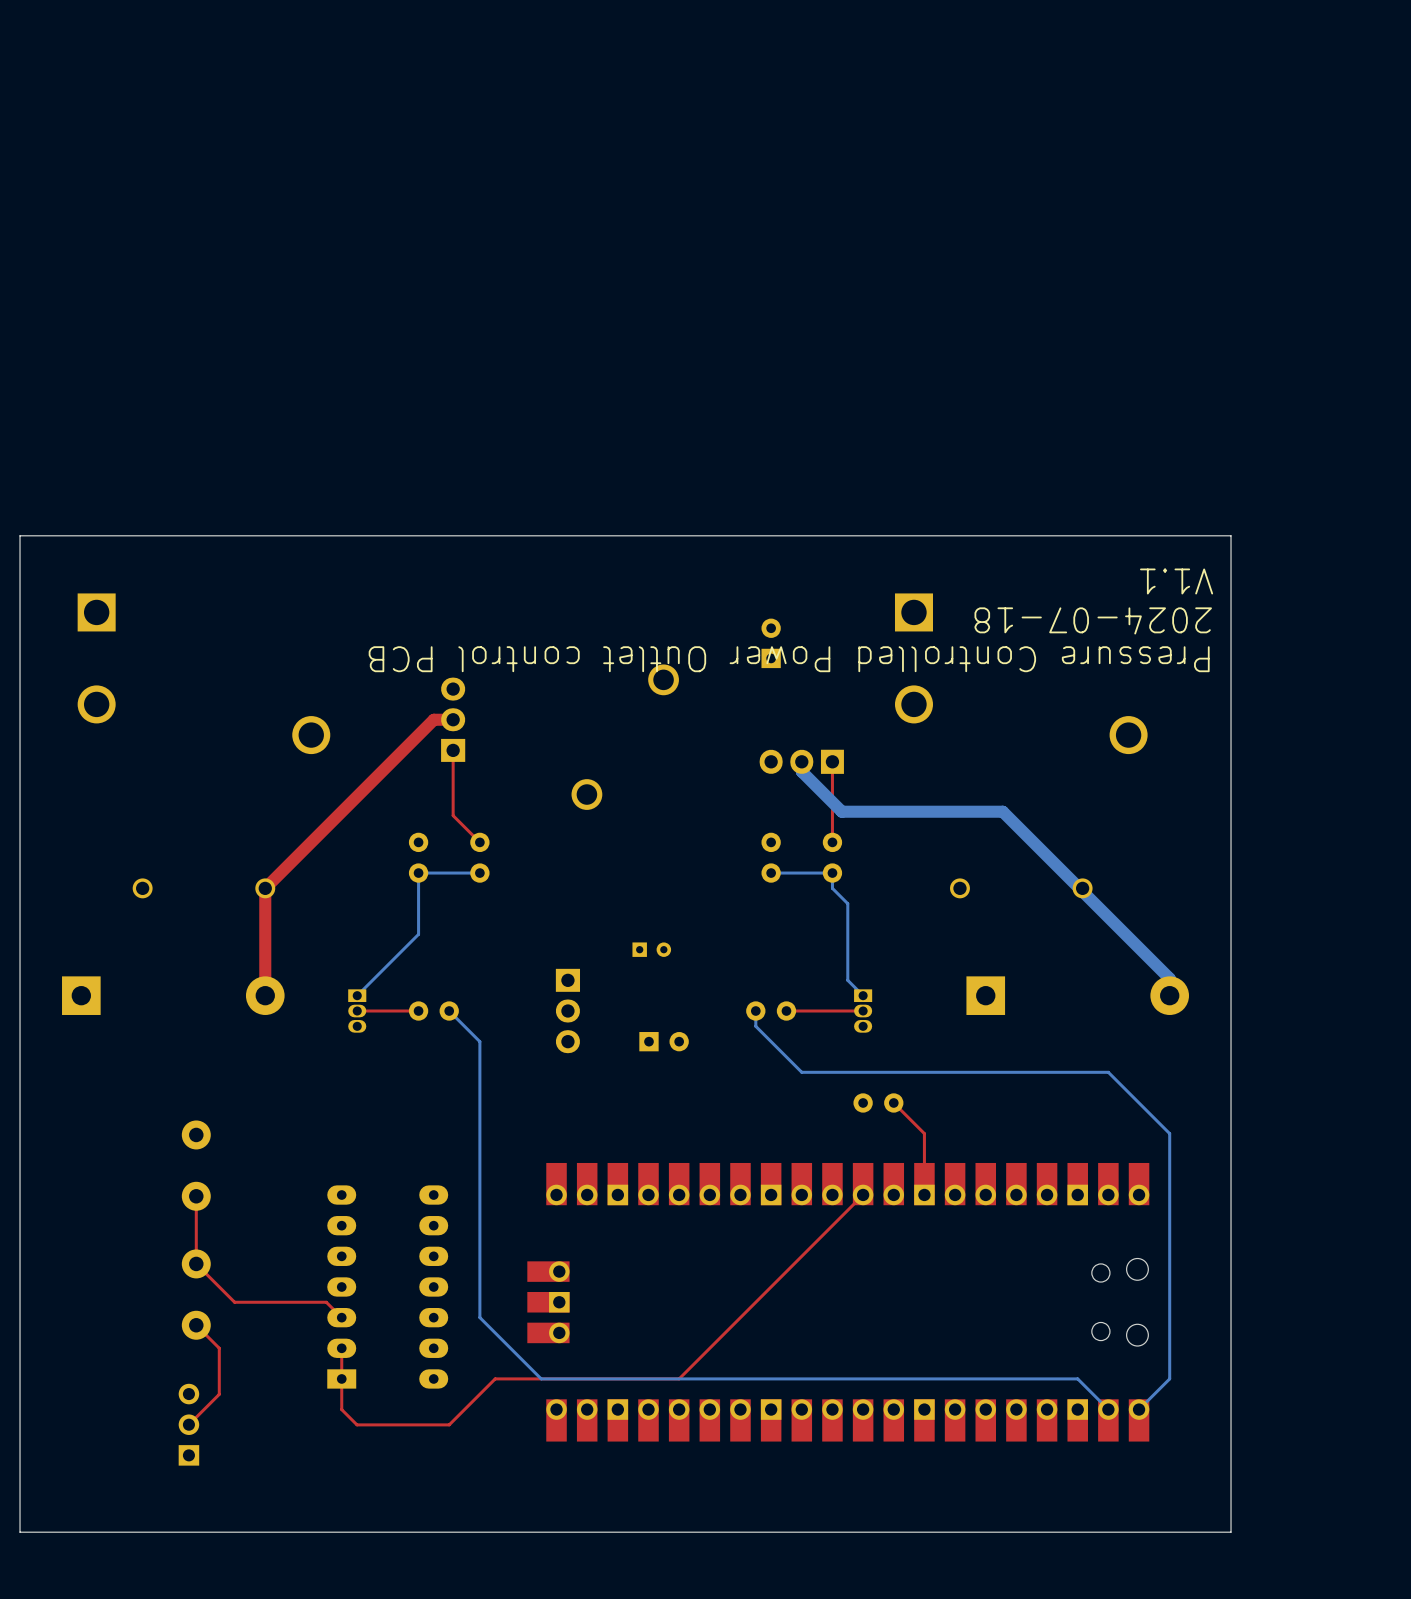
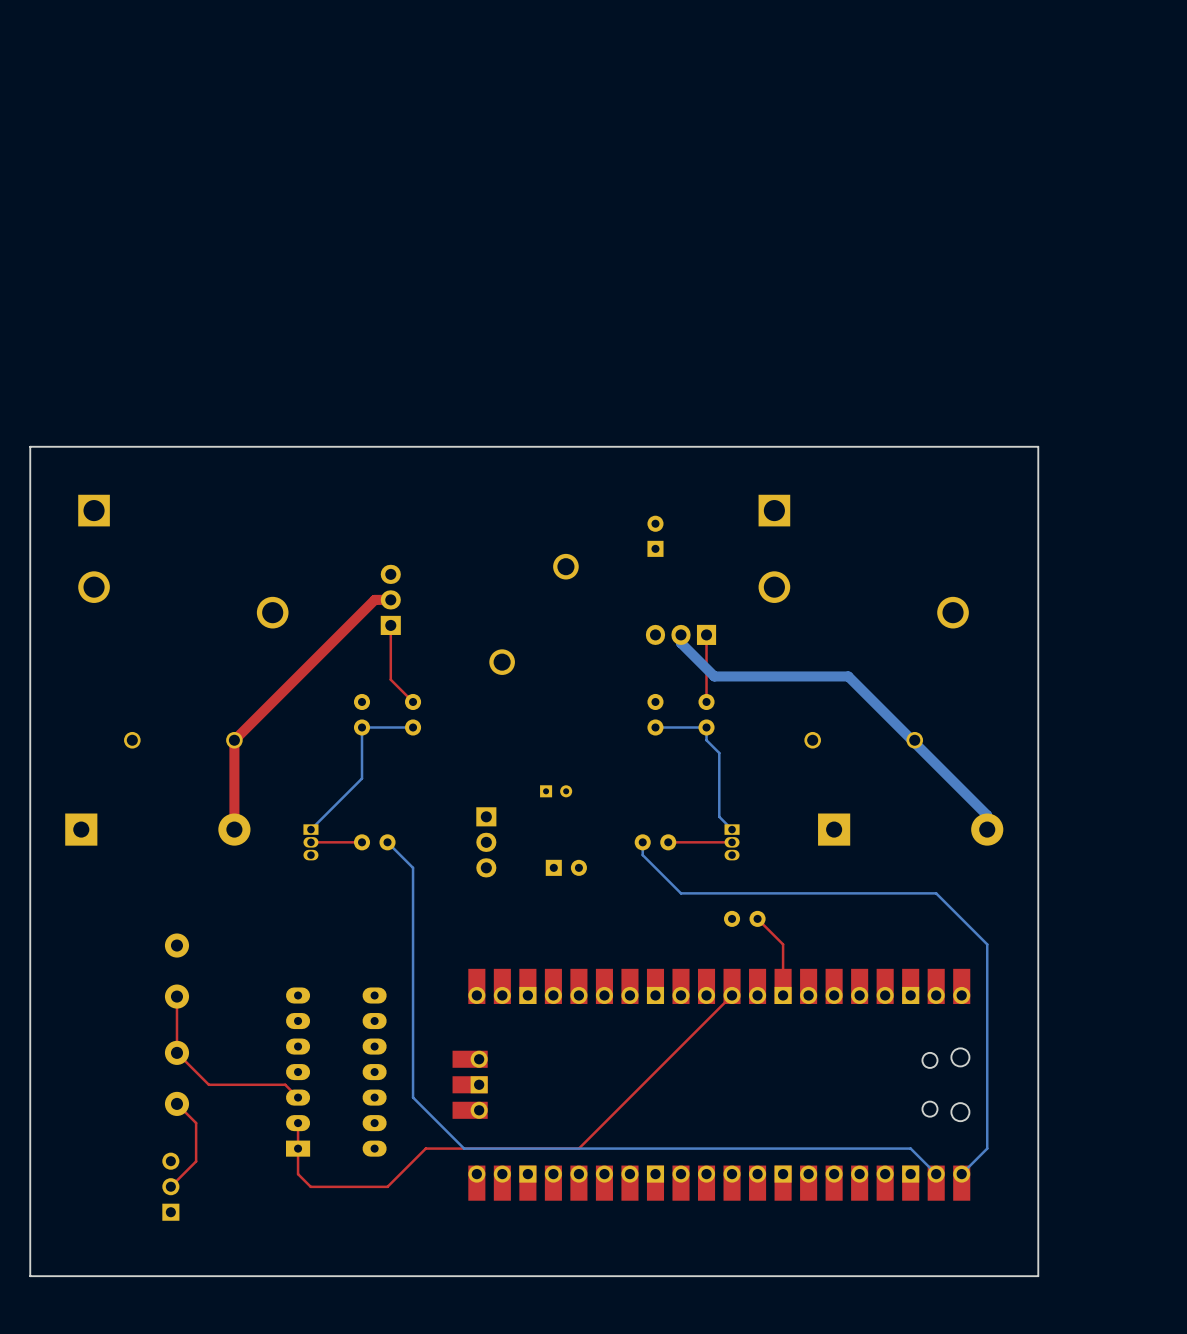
text: V1.1 (1176, 581) -> none
text: 2024-07-18 (1093, 620) -> none
text: Pressure Controlled Power Outlet control PCB (789, 659) -> none

